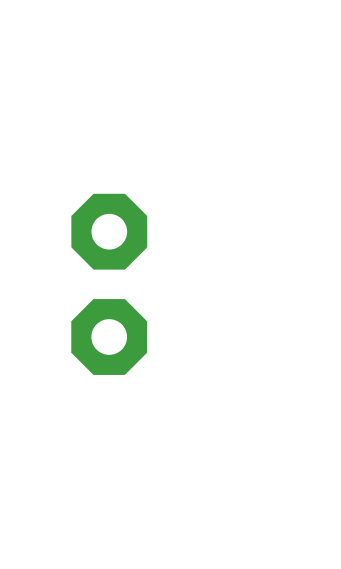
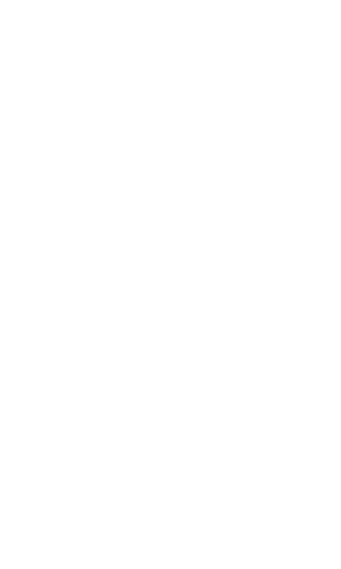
part: (109, 231) -> none
part: (109, 336) -> none

